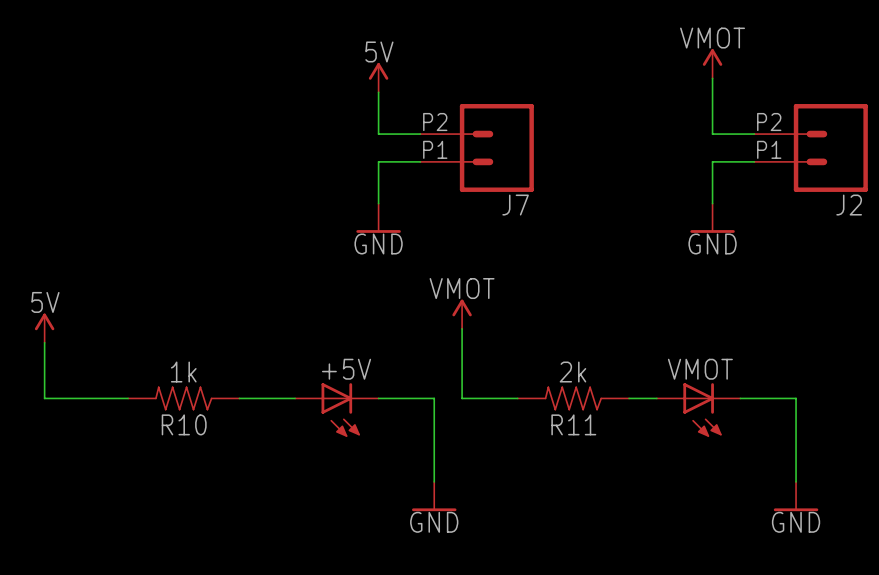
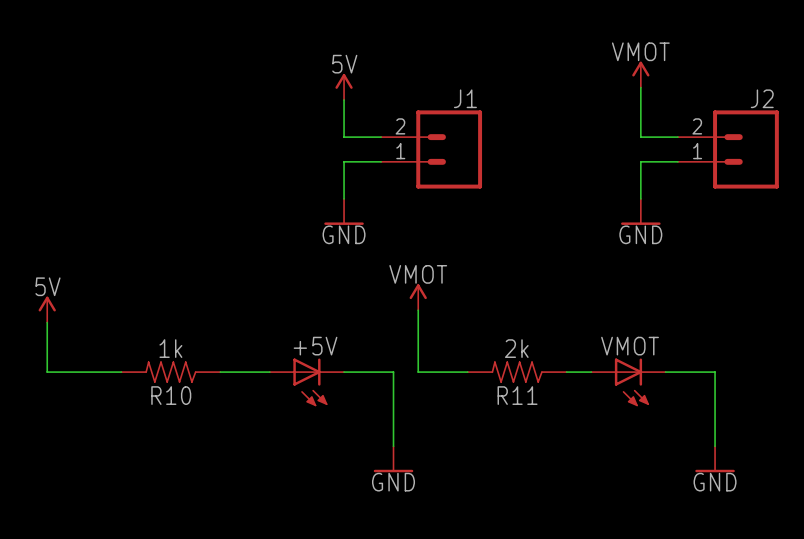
J7 pin number: P2 (435, 122) -> 2 (400, 126)
J2 pin number: P2 (769, 122) -> 2 (697, 126)
J7 pin number: P1 (435, 149) -> 1 (400, 151)
J2 pin number: P1 (769, 149) -> 1 (697, 151)
J7 name: J7 (515, 205) -> J1 (465, 98)
J2 name position: J2 (849, 205) -> J2 (762, 98)

